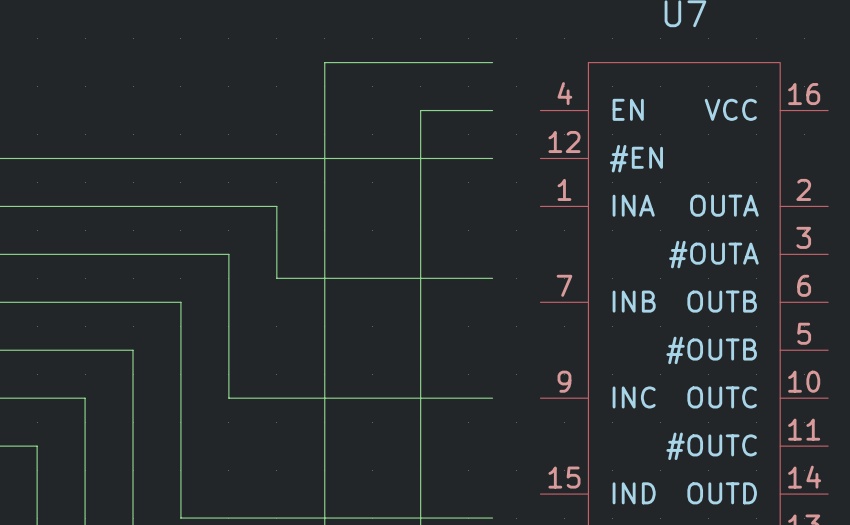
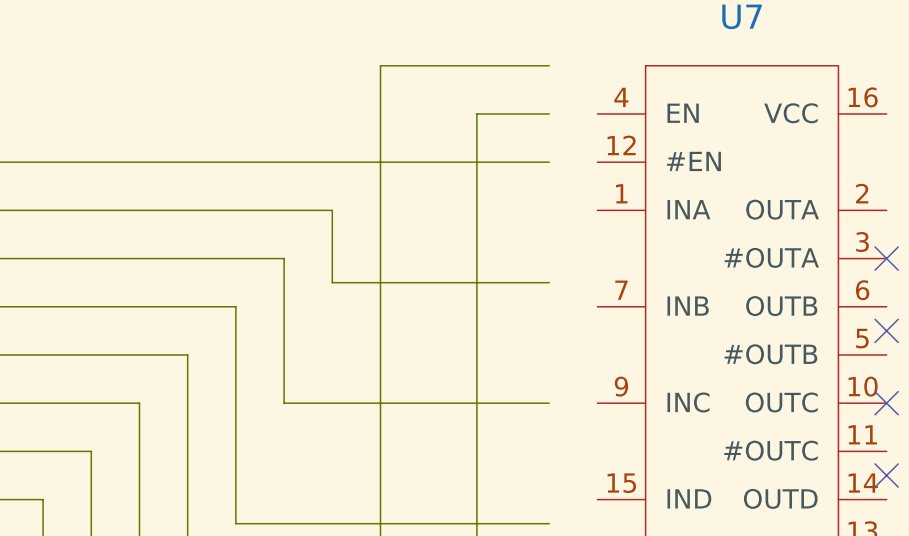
no-connect mark: none -> (886, 258)
no-connect mark: none -> (886, 330)
no-connect mark: none -> (886, 403)
no-connect mark: none -> (886, 475)

